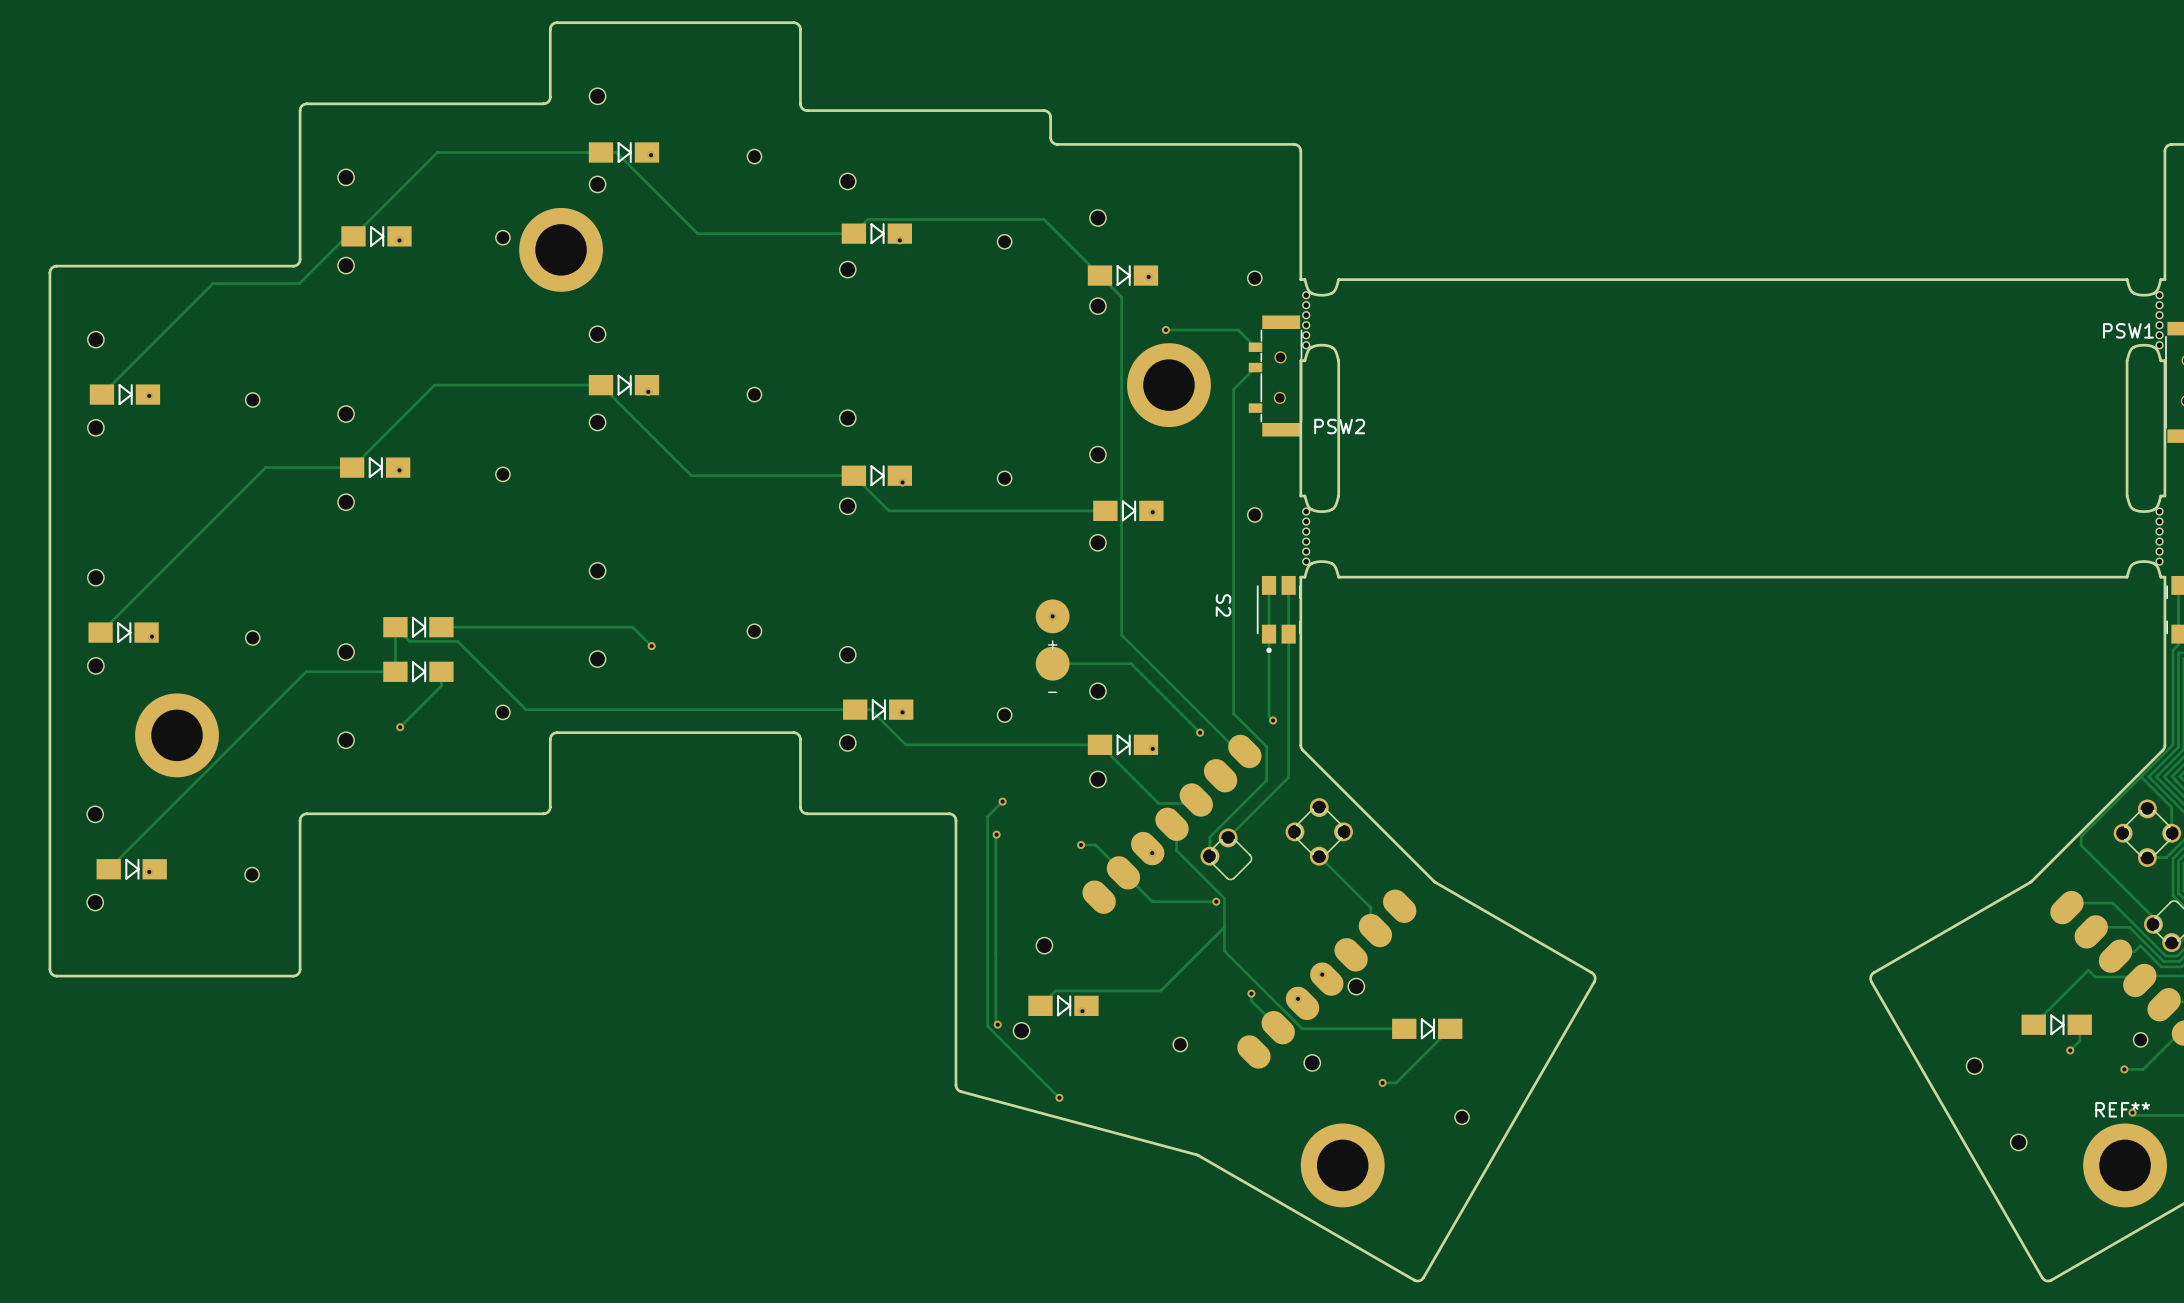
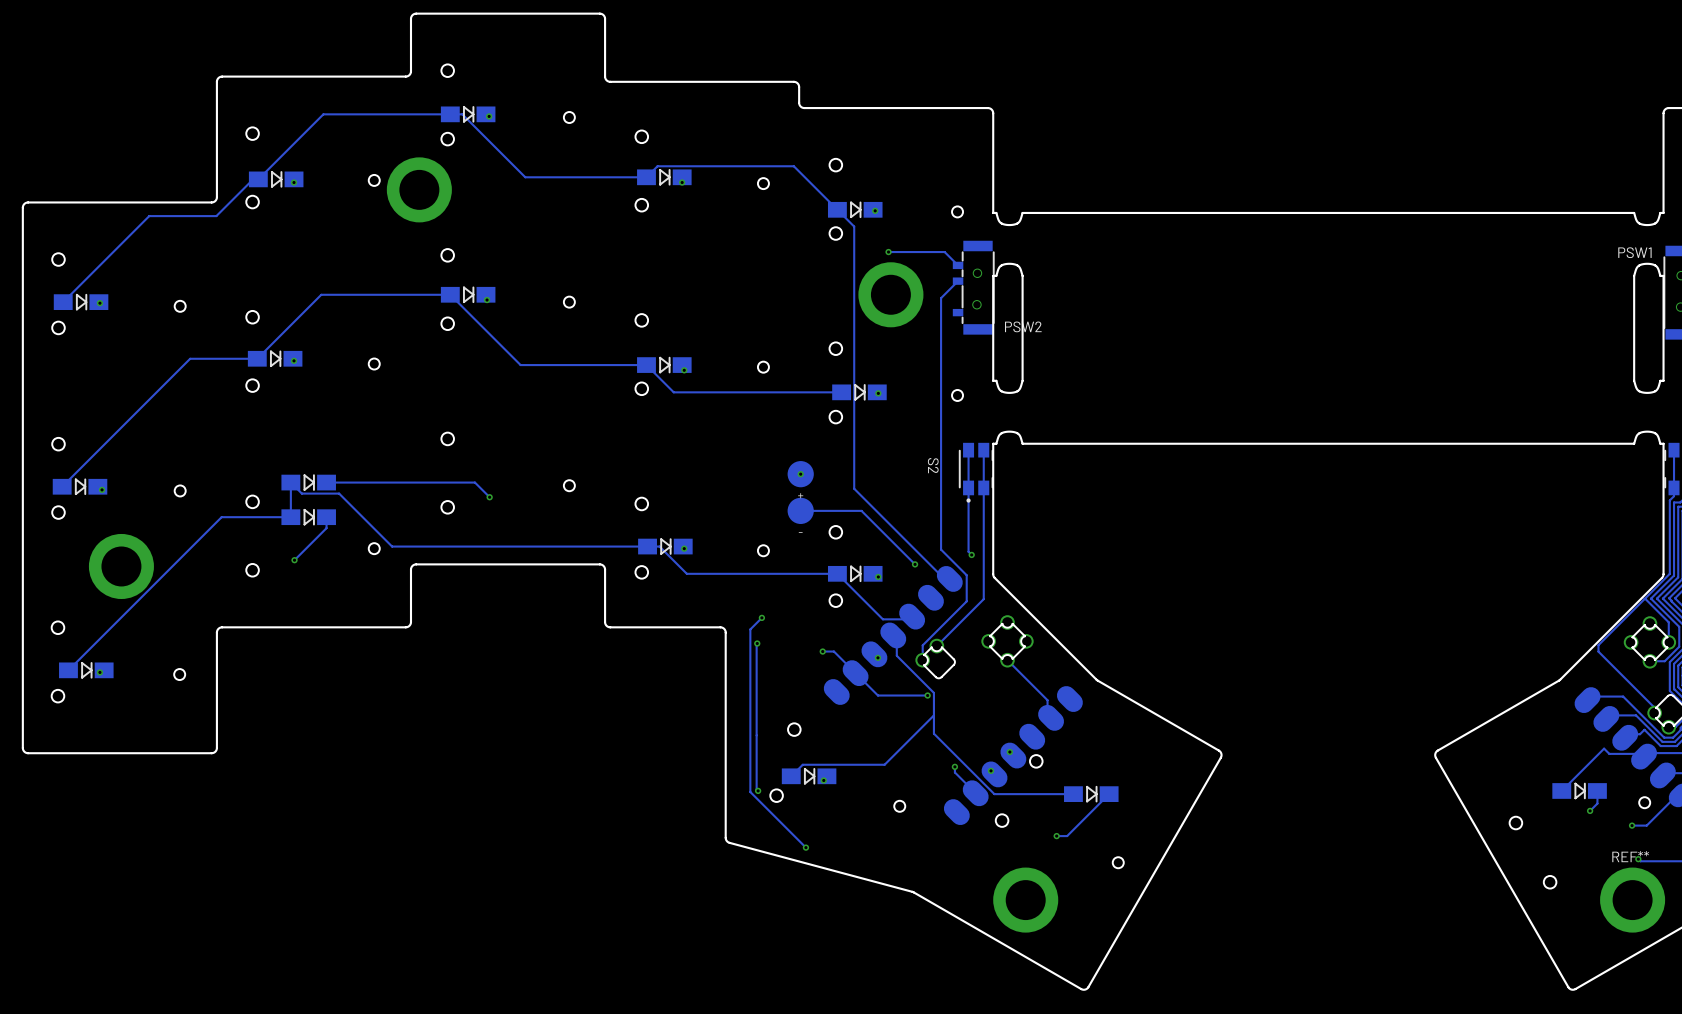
part: (1306, 320) -> none
part: (2159, 320) -> none
part: (1306, 536) -> none
part: (2159, 536) -> none

